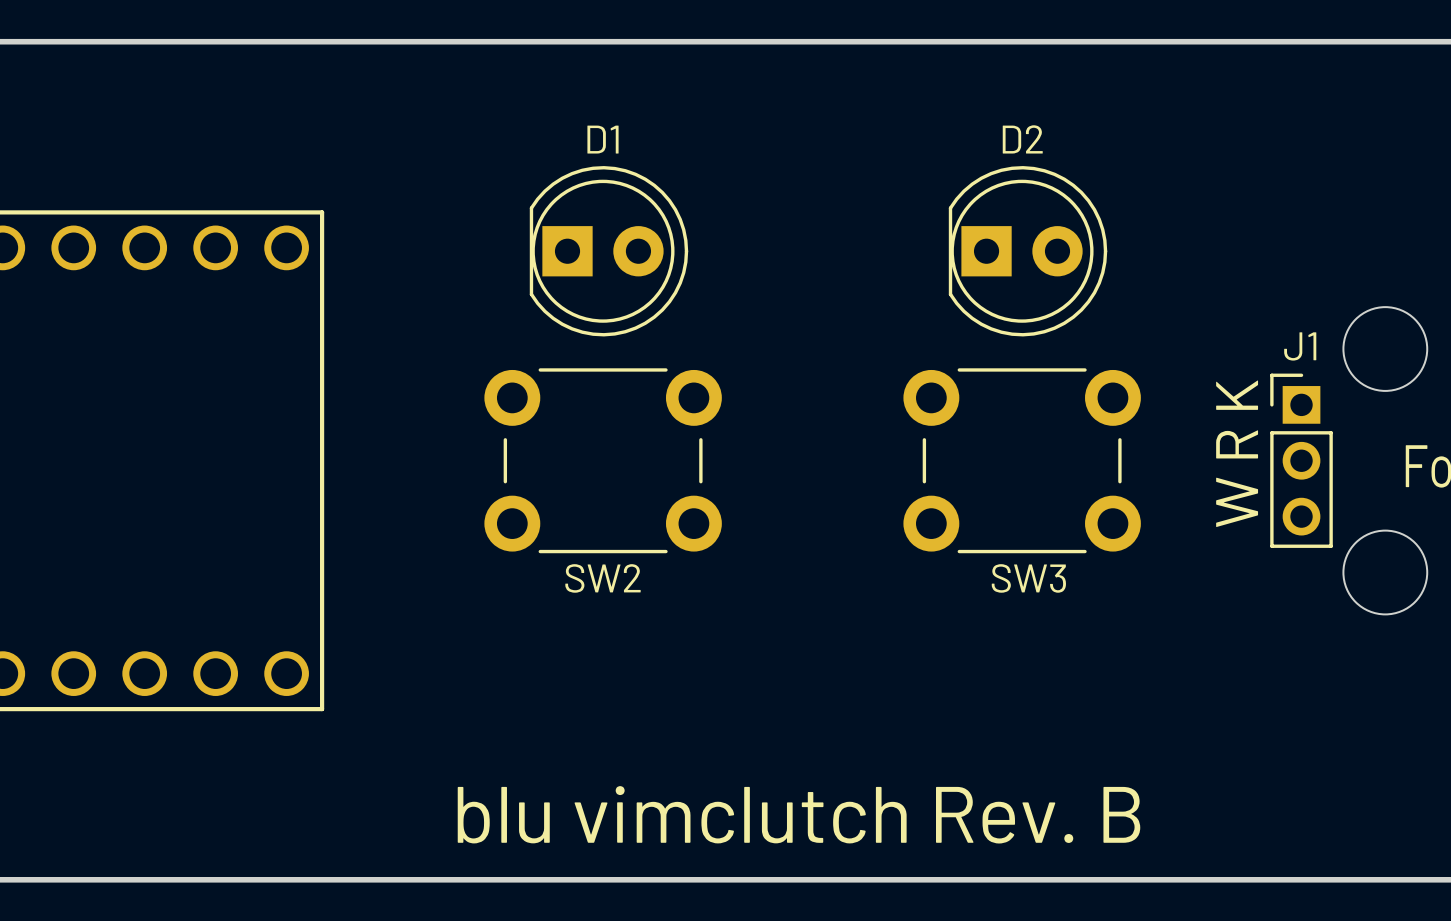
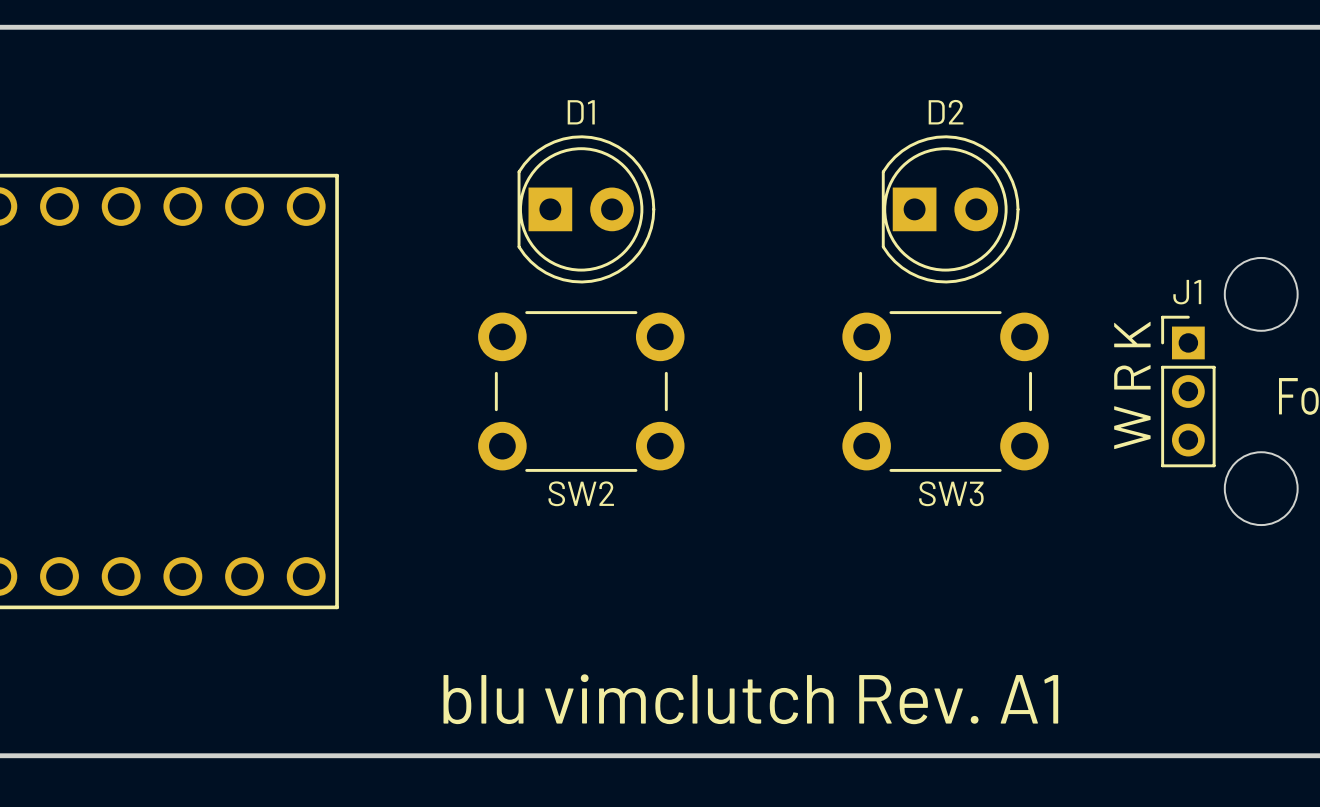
text: blu vimclutch Rev. B (798, 814) -> blu vimclutch Rev. A1 (750, 699)

